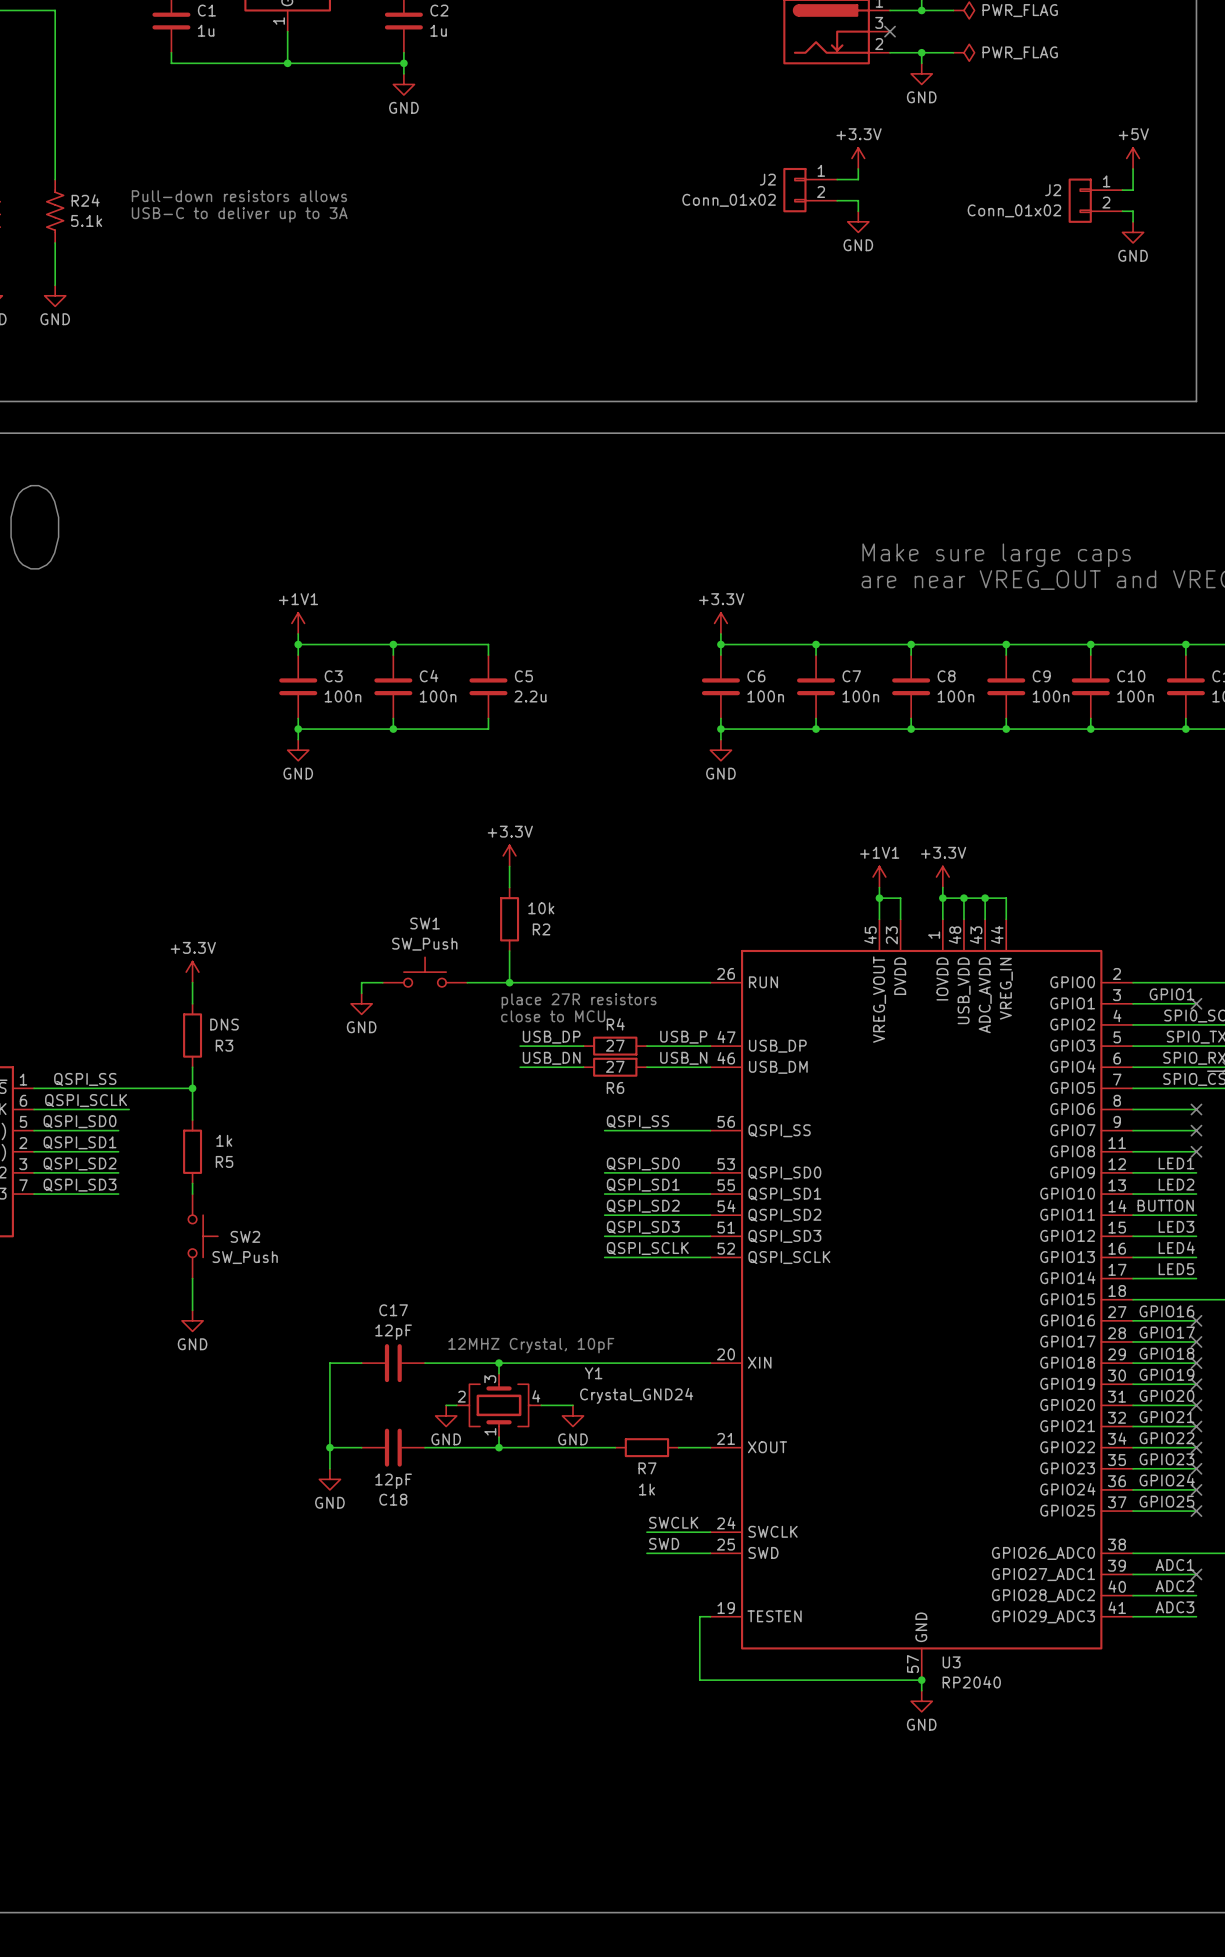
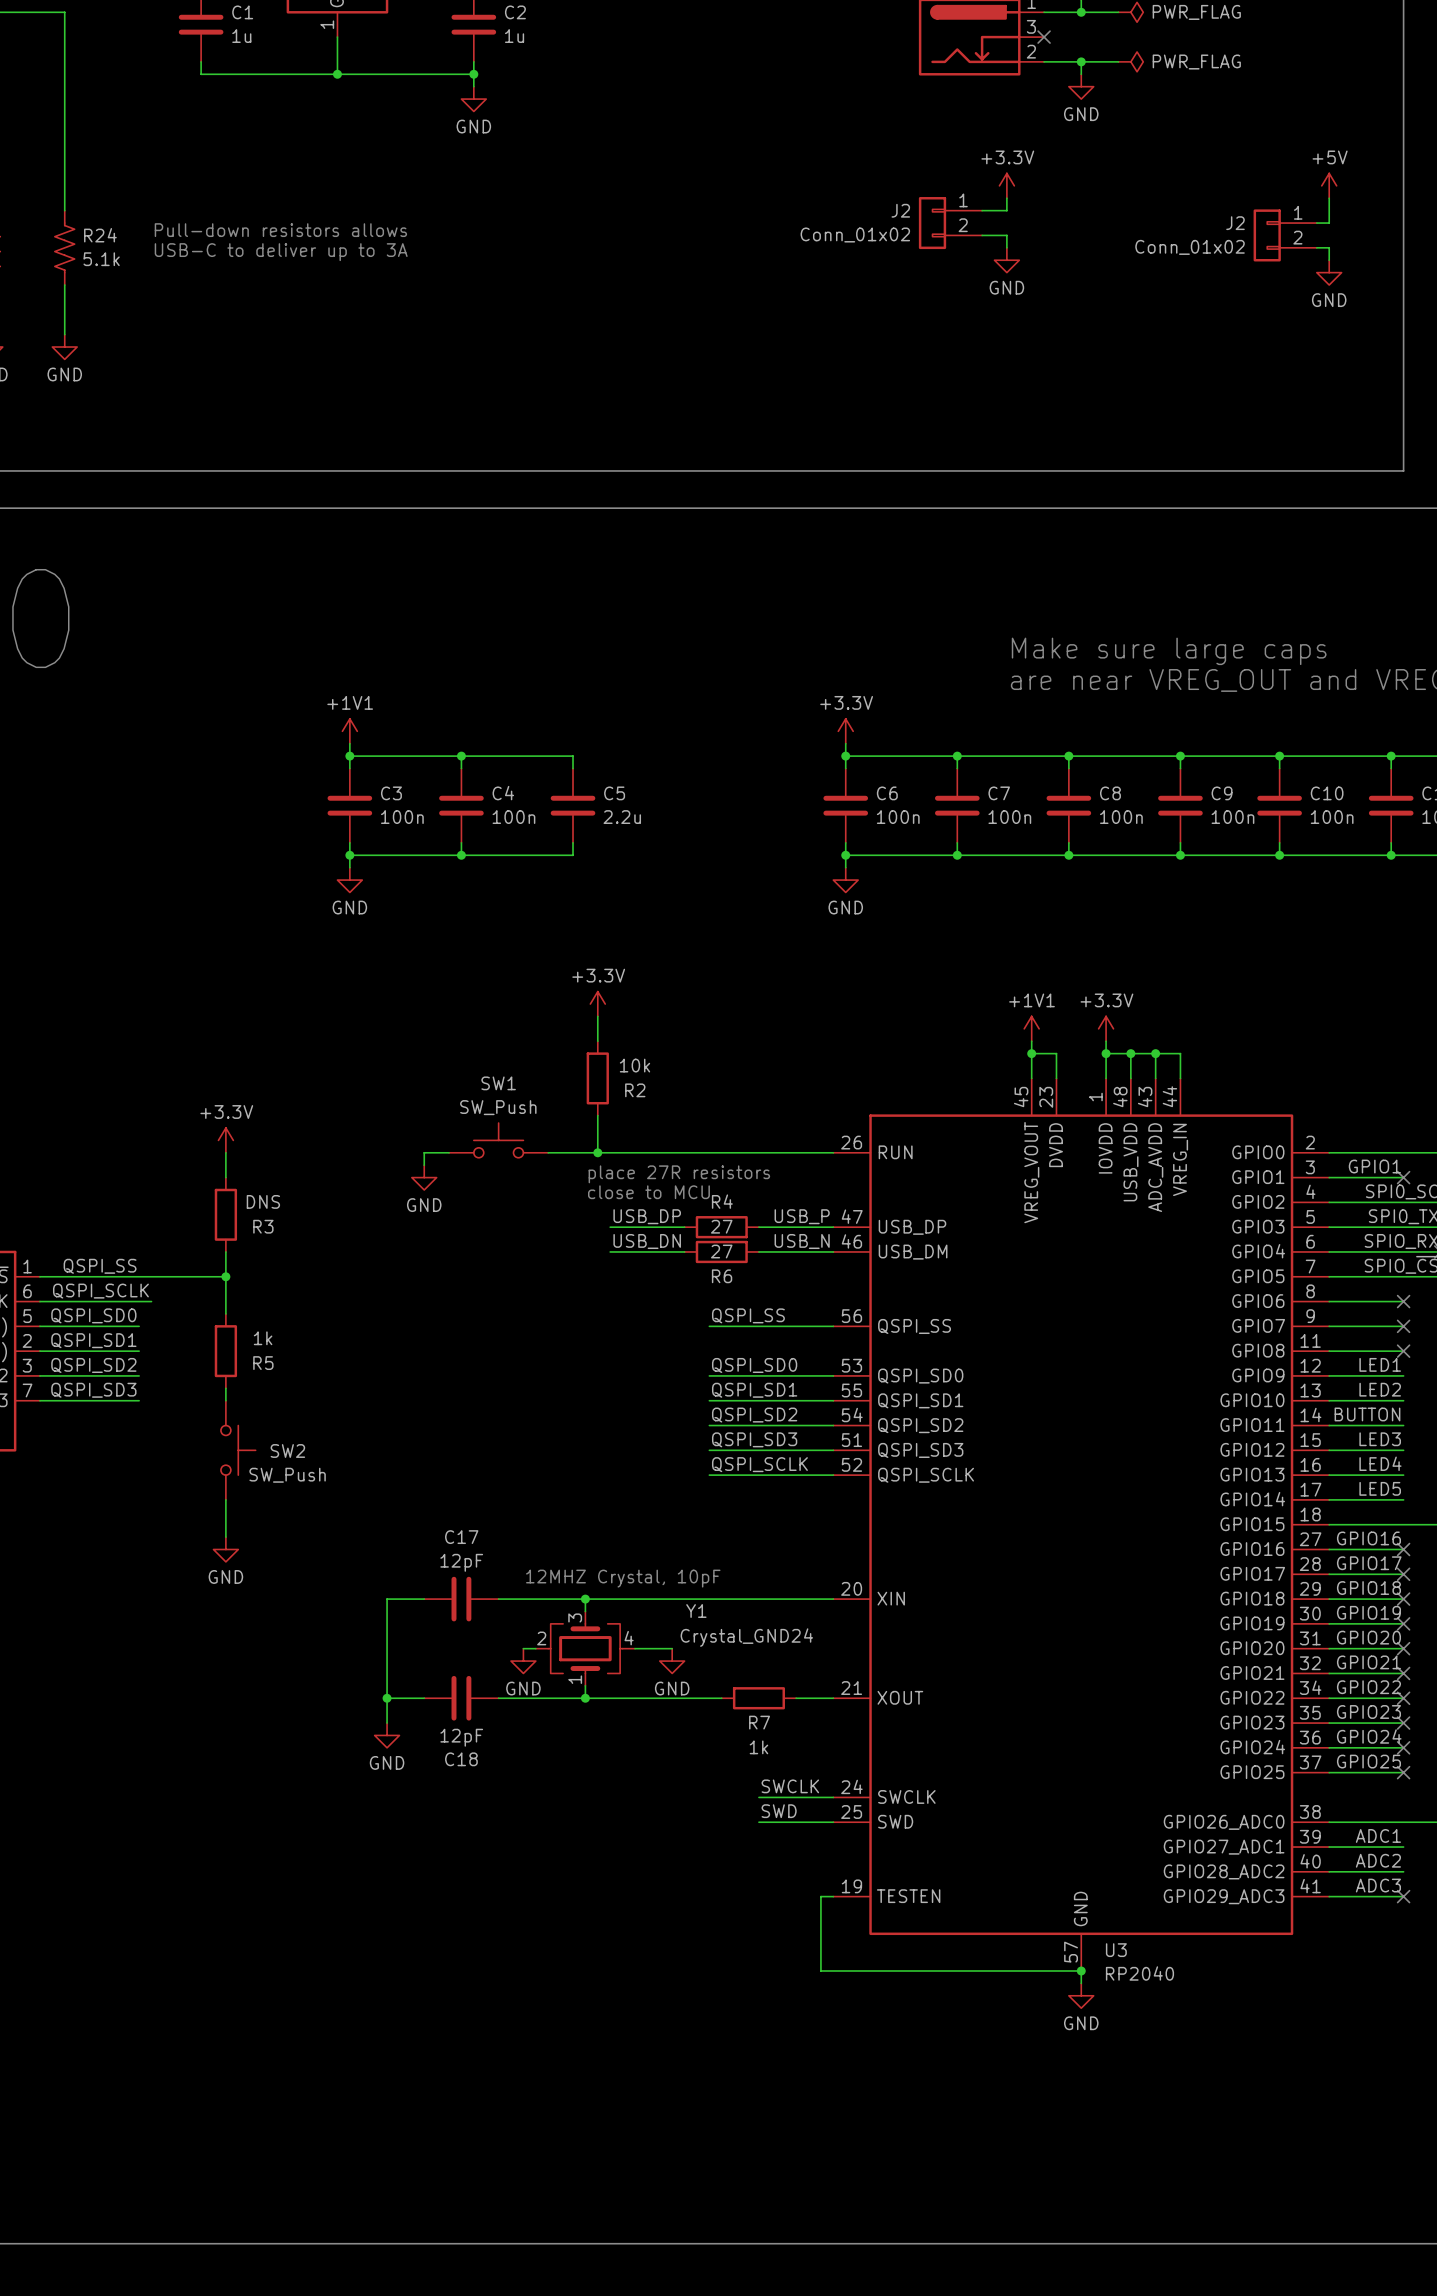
no-connect mark position: (1196, 1574) -> (1403, 1896)

